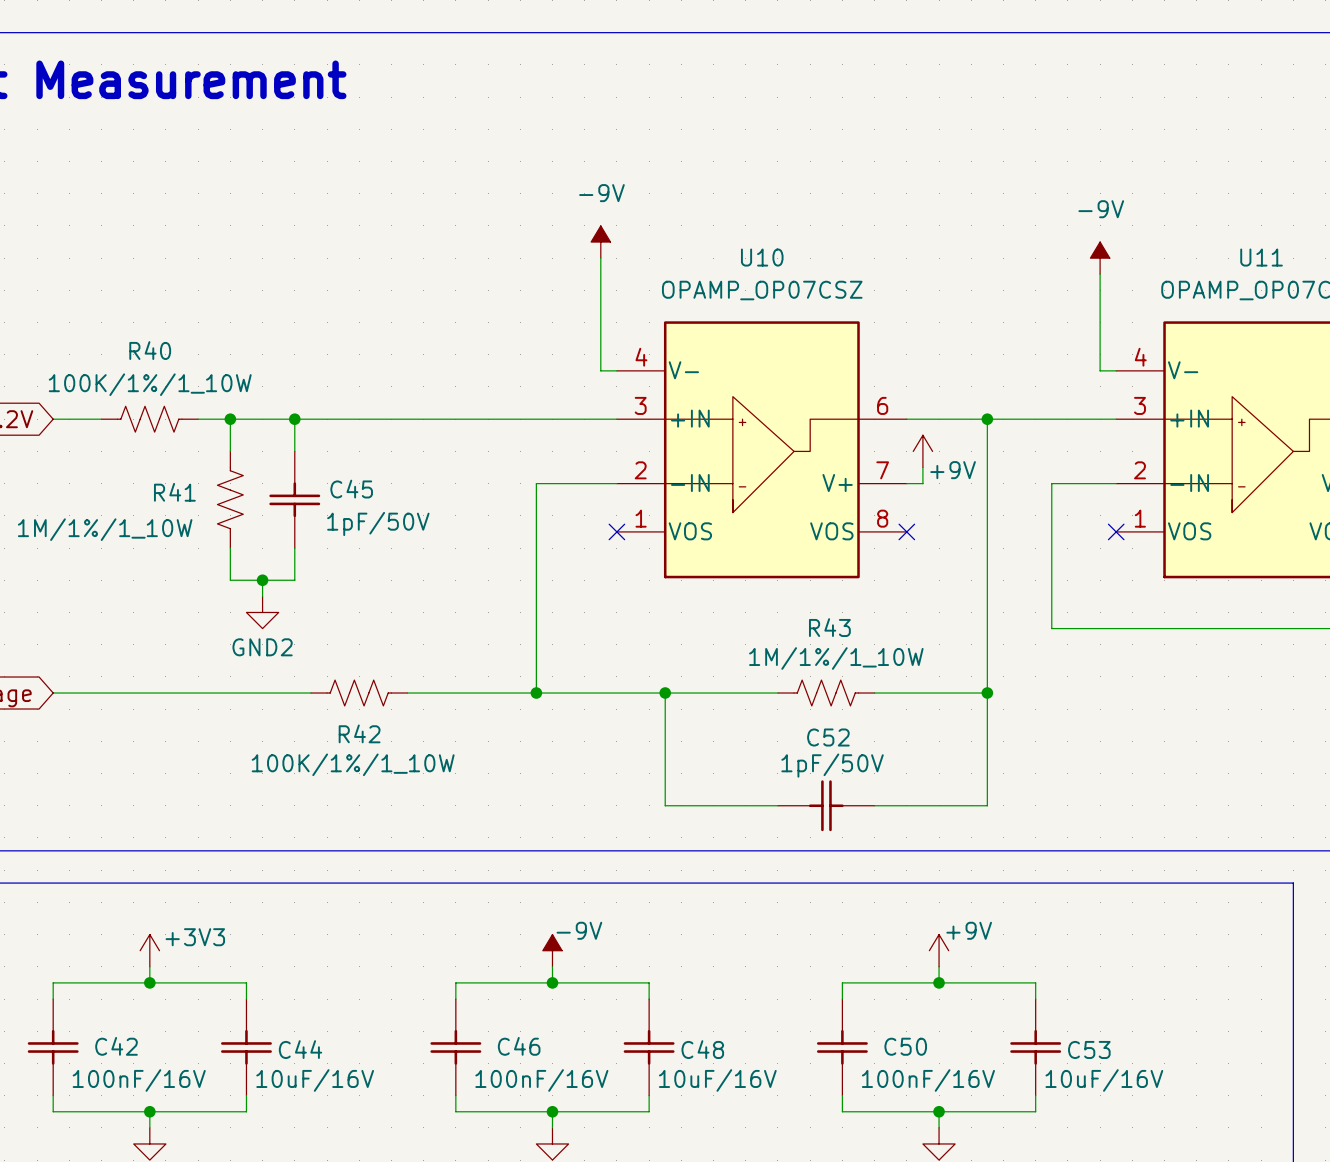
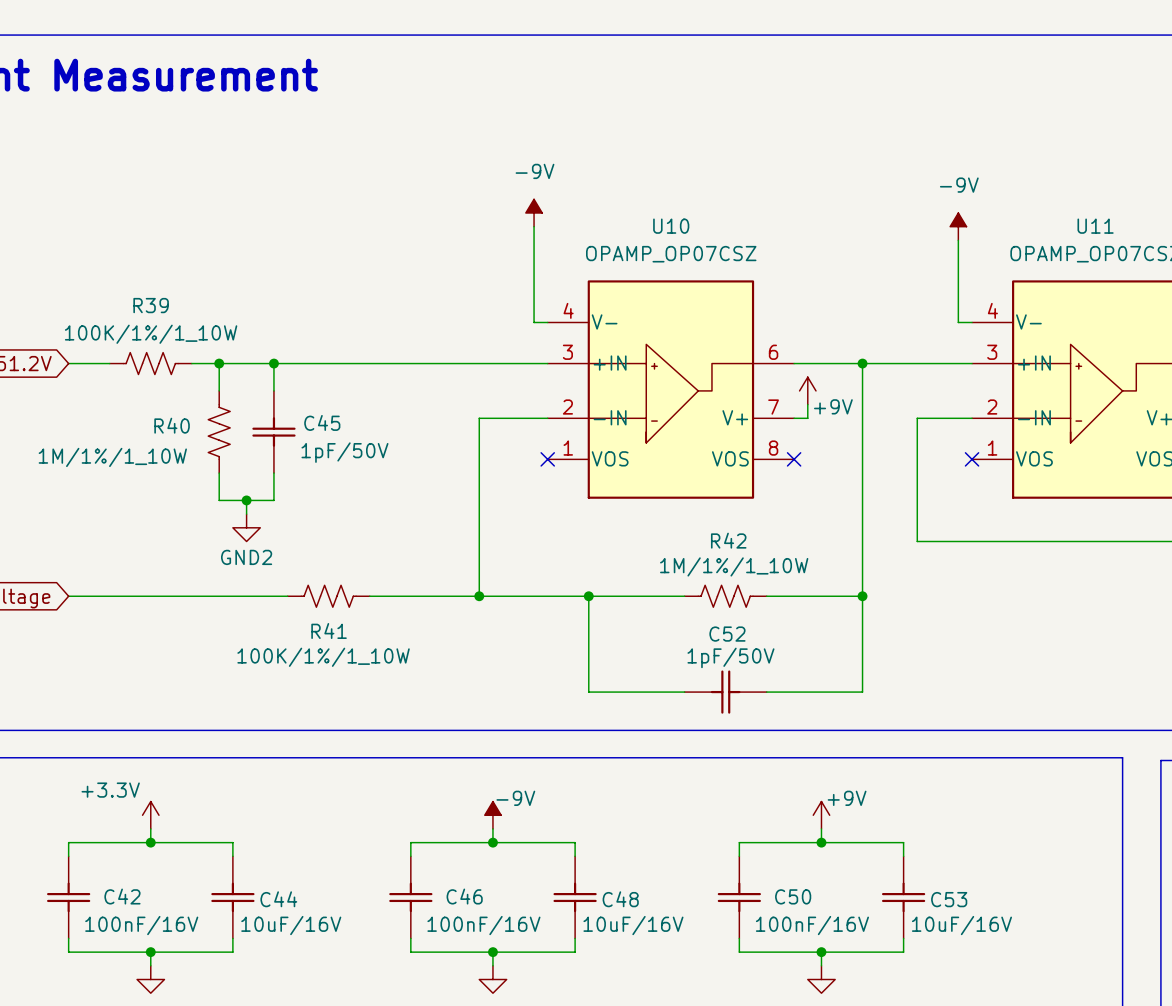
R40 name: R40 (150, 350) -> R39 (151, 305)
R41 name: R41 (174, 492) -> R40 (172, 425)
R43 name: R43 (829, 627) -> R42 (728, 540)
R42 name: R42 (359, 733) -> R41 (329, 631)
power symbol: +3V3 (149, 950) -> +3.3V (150, 815)

